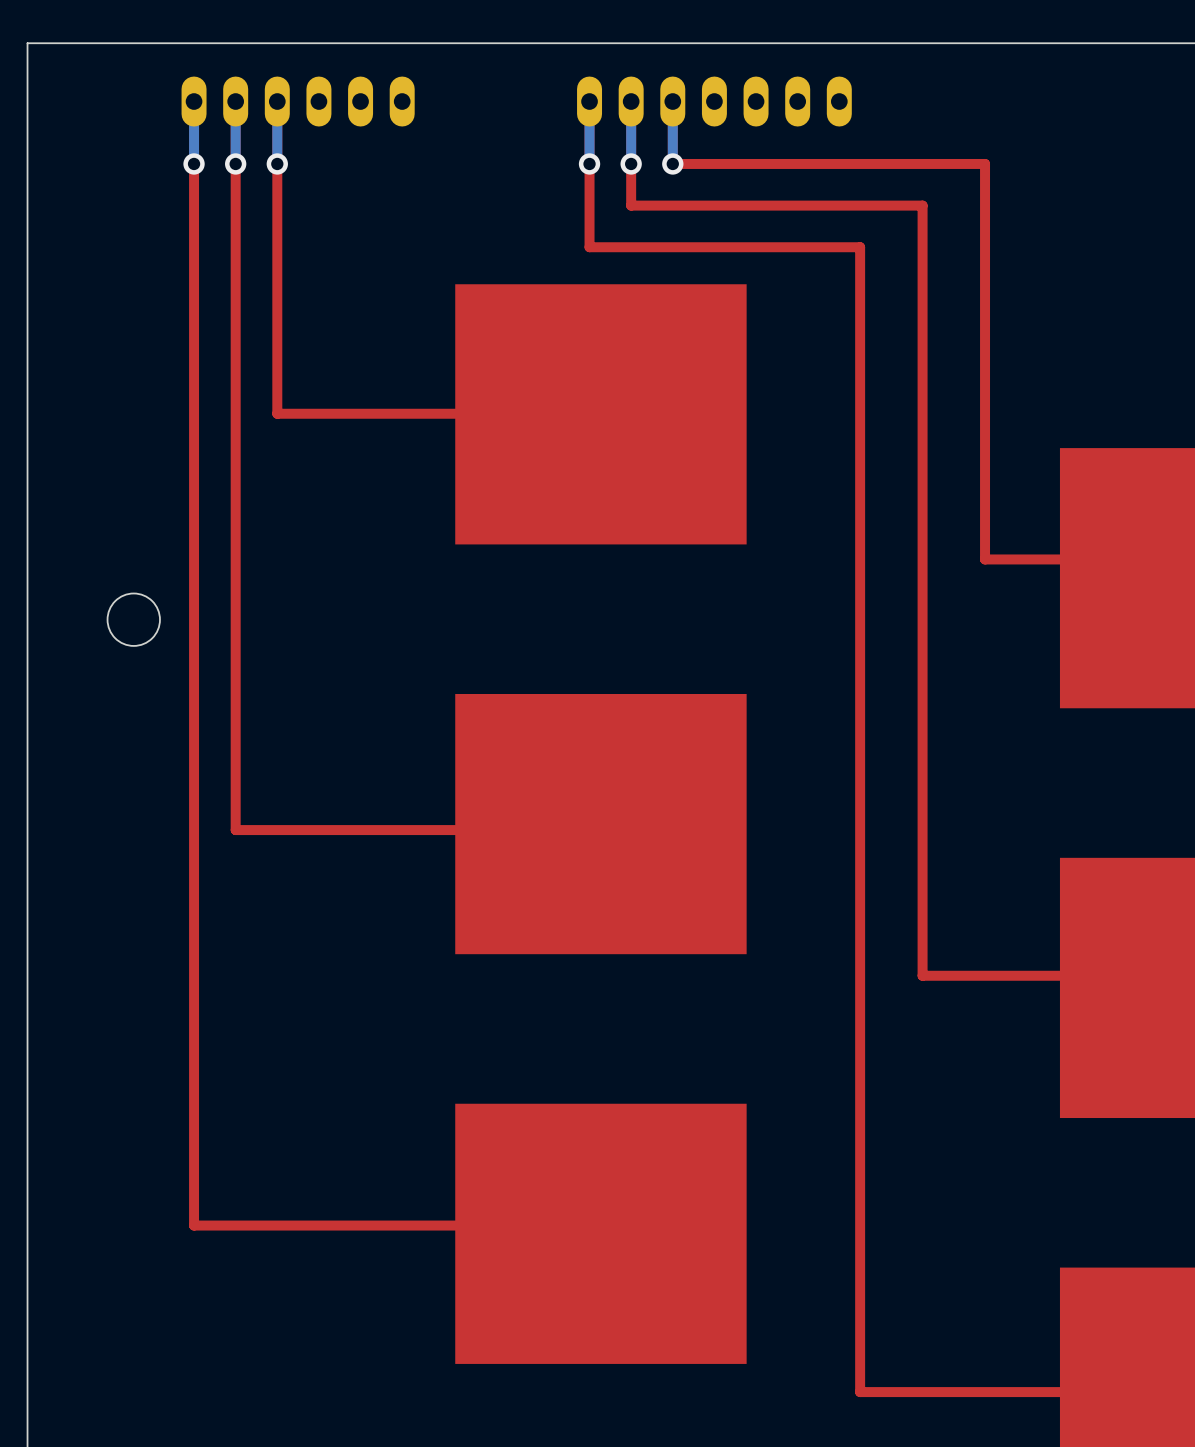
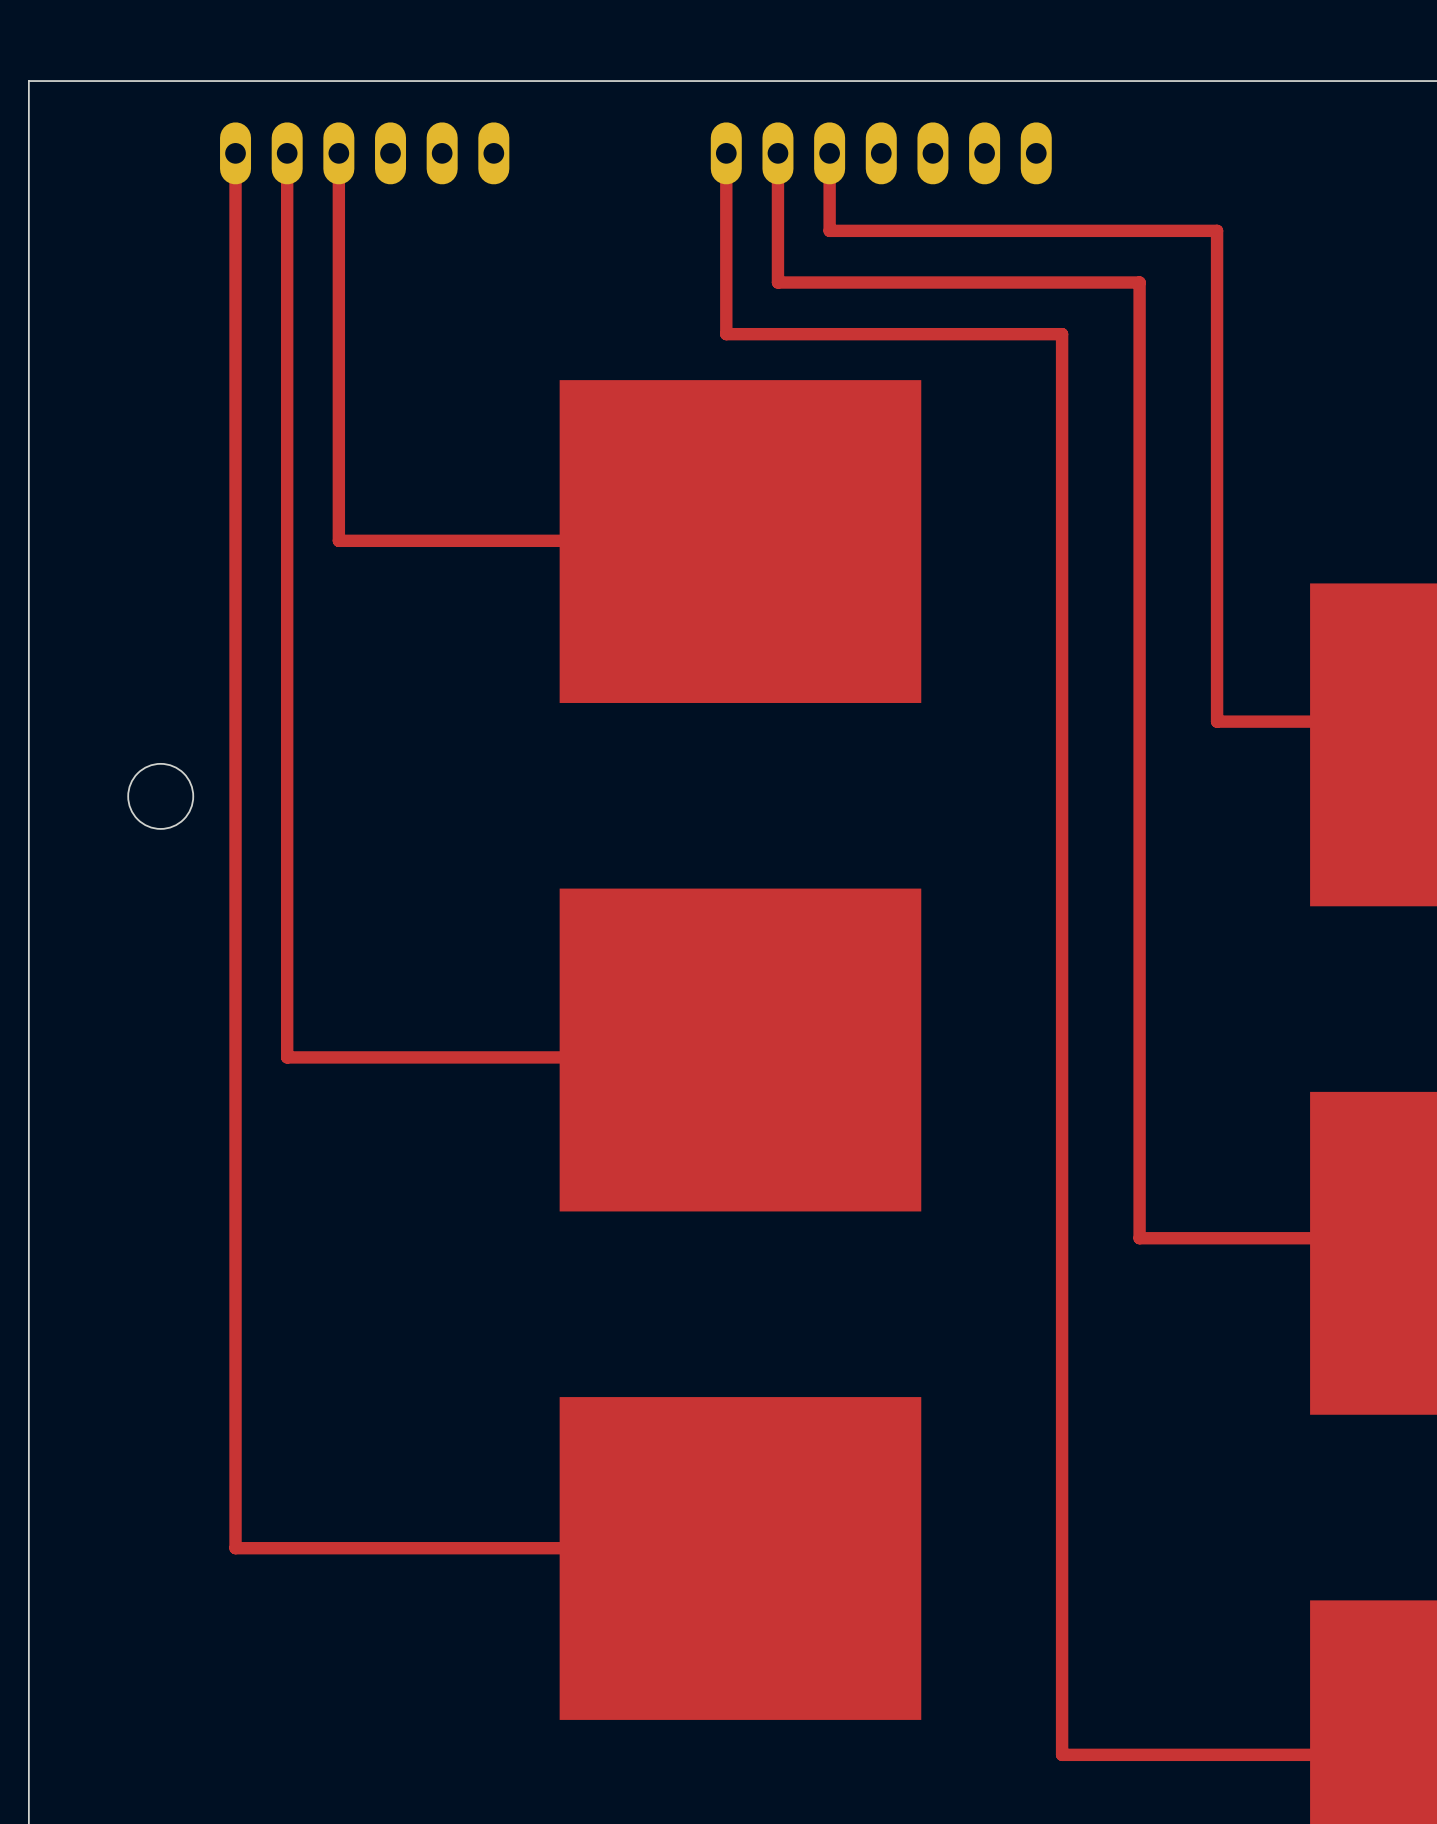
bottom track: (194, 101) (194, 163) -> none
bottom track: (235, 101) (235, 163) -> none
bottom track: (277, 101) (277, 163) -> none
bottom track: (589, 101) (589, 163) -> none
bottom track: (631, 101) (631, 163) -> none
bottom track: (672, 101) (672, 163) -> none
via: (194, 163) -> none
via: (235, 163) -> none
via: (277, 163) -> none
via: (589, 163) -> none
via: (631, 163) -> none
via: (672, 163) -> none

